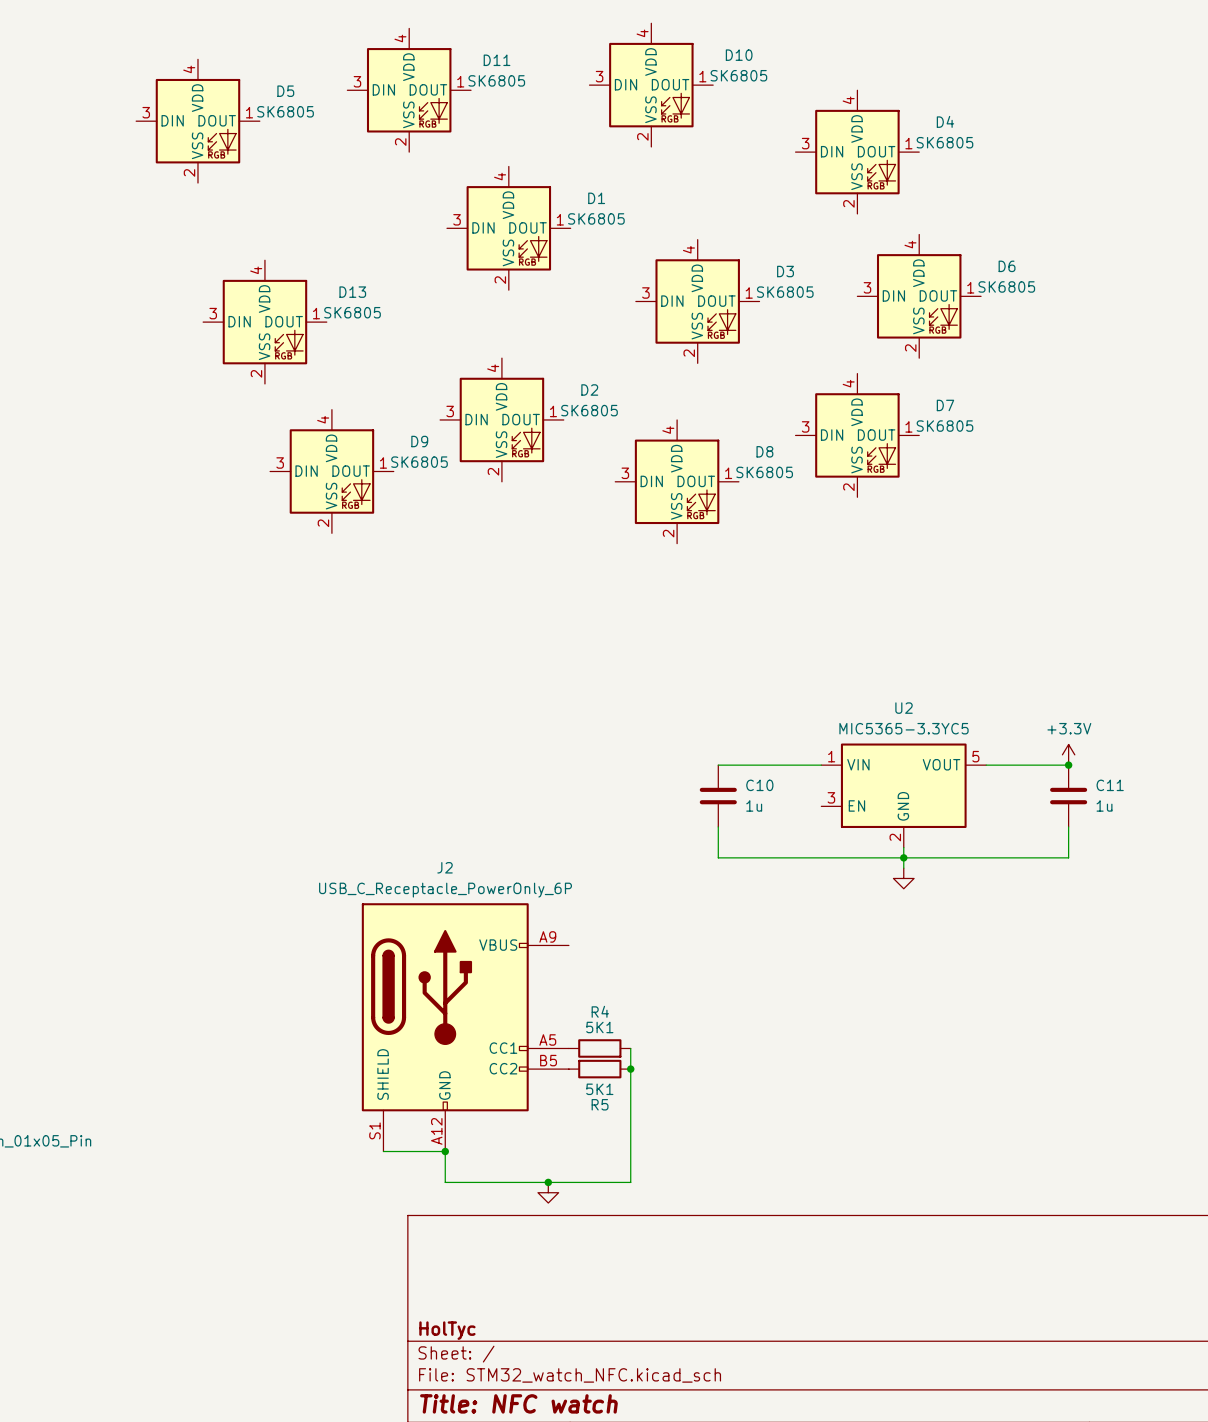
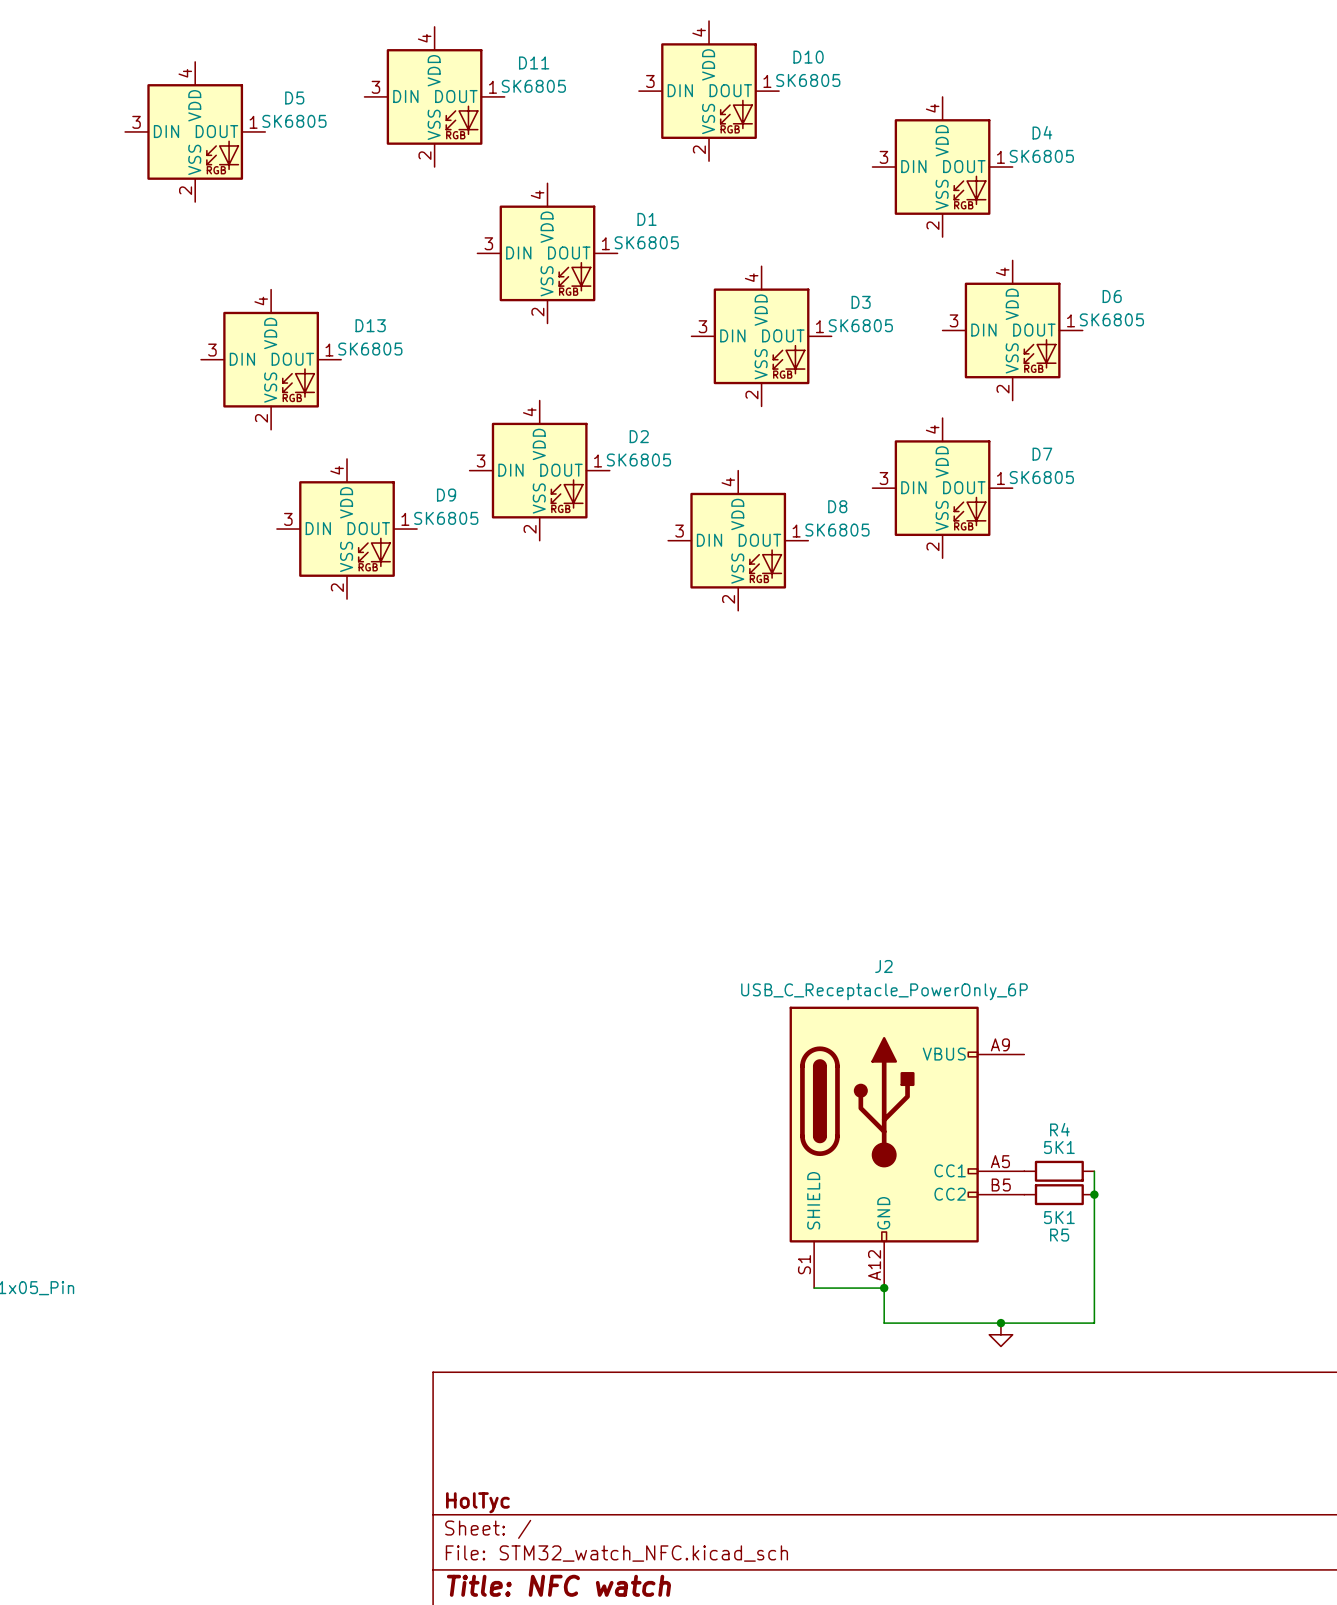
power symbol: +3.3V (1068, 754) -> none
wire: (718, 765) (821, 765) -> none
wire: (986, 765) (1068, 765) -> none
junction: (1068, 765) -> none
U2: MIC5365-3.3YC5 (903, 795) -> none
C10: 1u (718, 796) -> none
C11: 1u (1068, 796) -> none
wire: (718, 826) (718, 857) (1068, 857) (1068, 826) -> none
wire: (903, 847) (903, 868) -> none
junction: (903, 857) -> none
power symbol: (903, 878) -> none
J2 position: (465, 1027) -> (906, 1147)
wire: none -> (1094, 1171) (1094, 1323) (884, 1323) (884, 1288) (814, 1288)
R4 position: (599, 1048) -> (1059, 1171)
wire: (630, 1048) (630, 1182) (445, 1182) (445, 1151) (383, 1151) -> none
junction: none -> (1094, 1194)
R5 position: (599, 1069) -> (1059, 1194)
junction: (630, 1069) -> none
junction: none -> (884, 1288)
junction: (445, 1151) -> none
junction: none -> (1000, 1323)
junction: (548, 1182) -> none
power symbol: none -> (1000, 1334)
power symbol: (548, 1192) -> none

